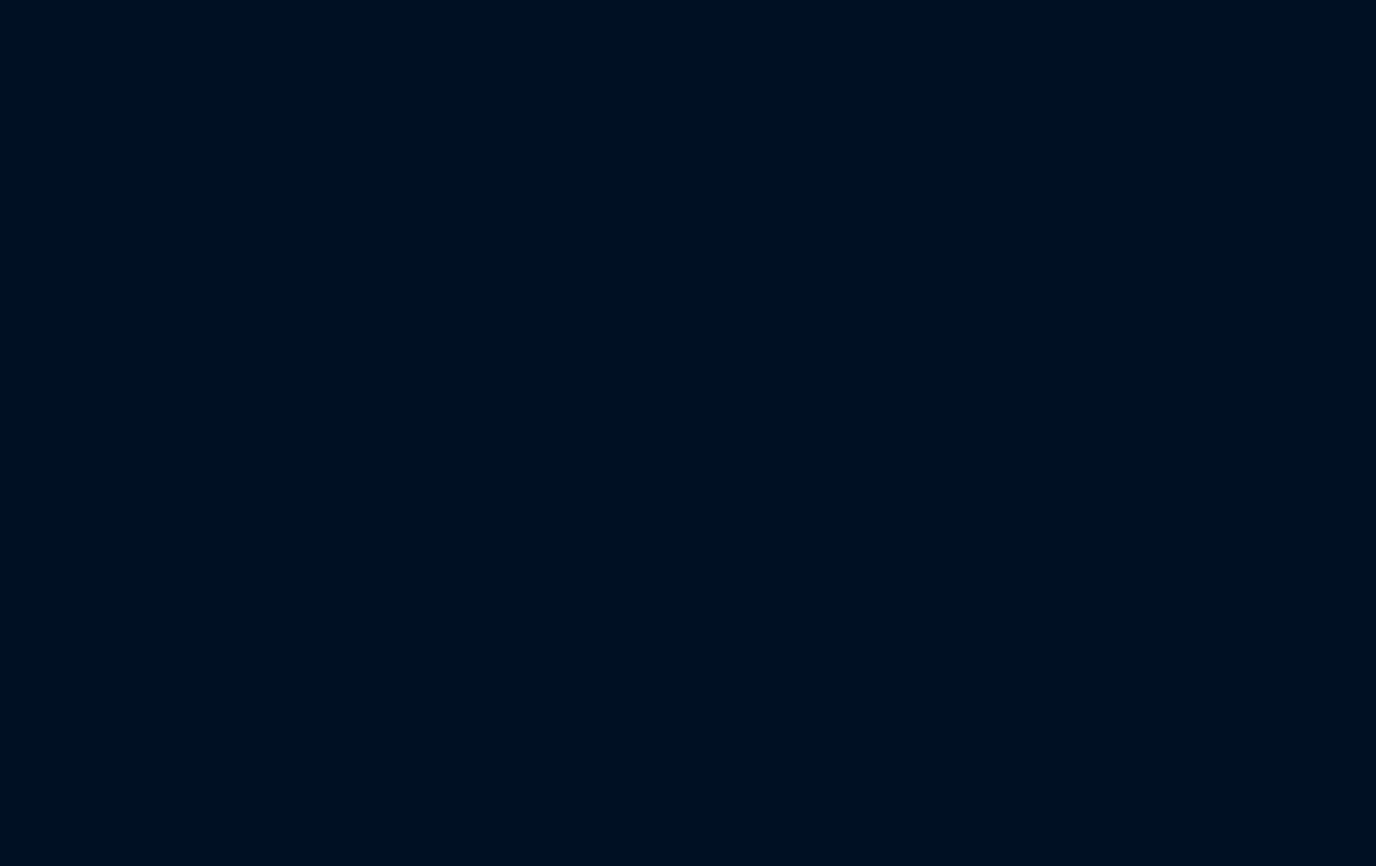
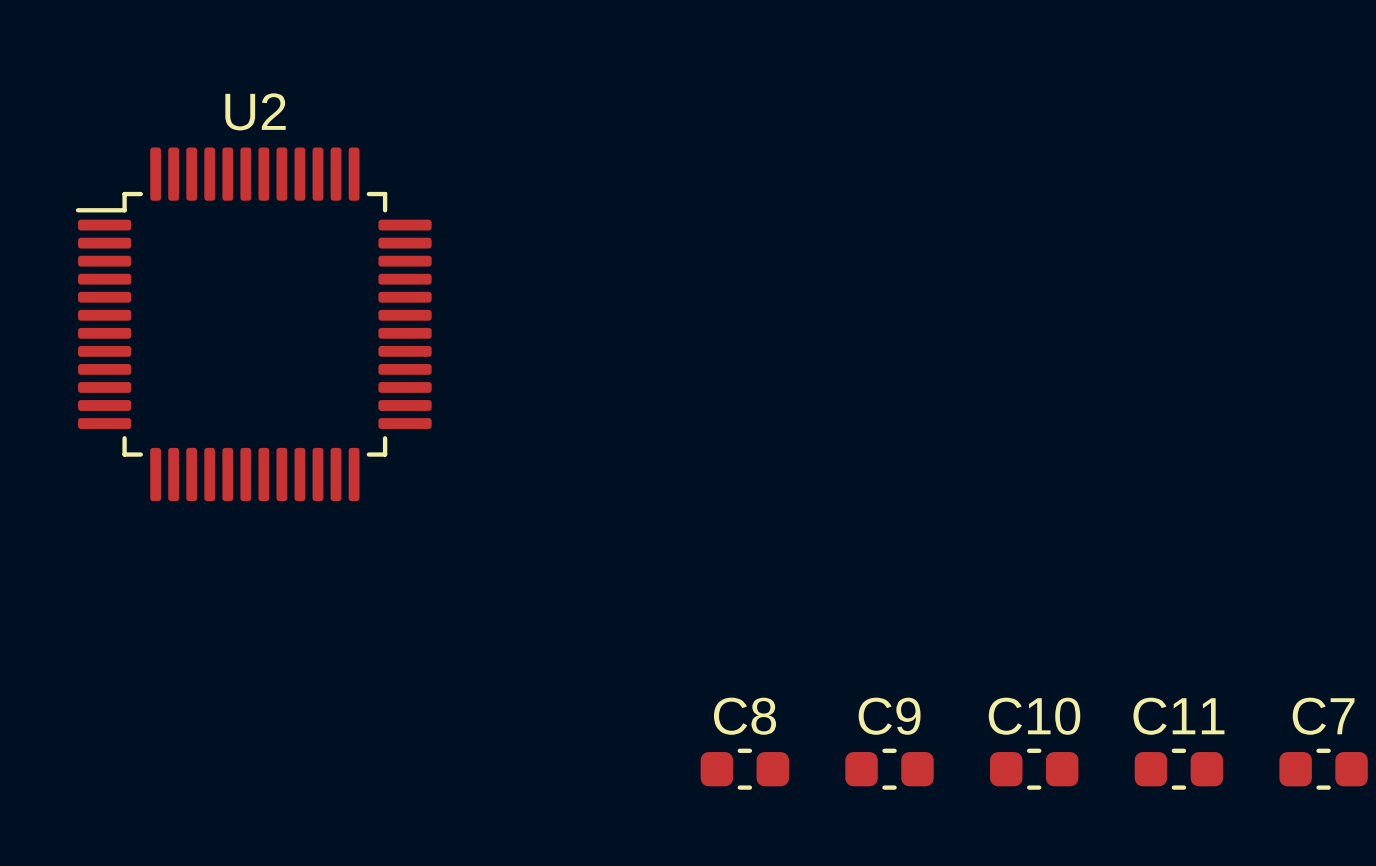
U2: none -> (253, 324)
C8: none -> (744, 769)
C9: none -> (889, 769)
C10: none -> (1034, 769)
C11: none -> (1178, 769)
C7: none -> (1323, 769)

